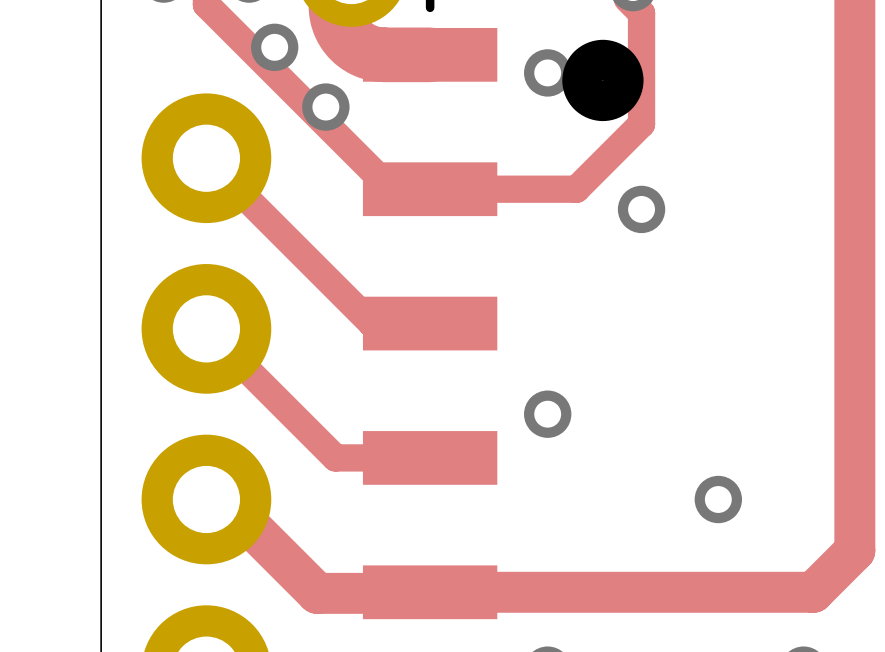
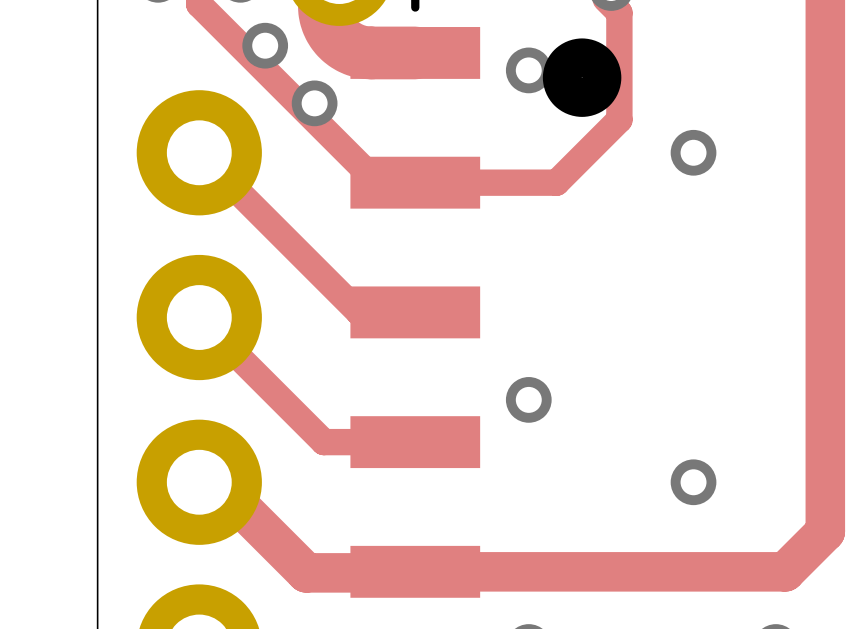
via position: (641, 209) -> (693, 152)

